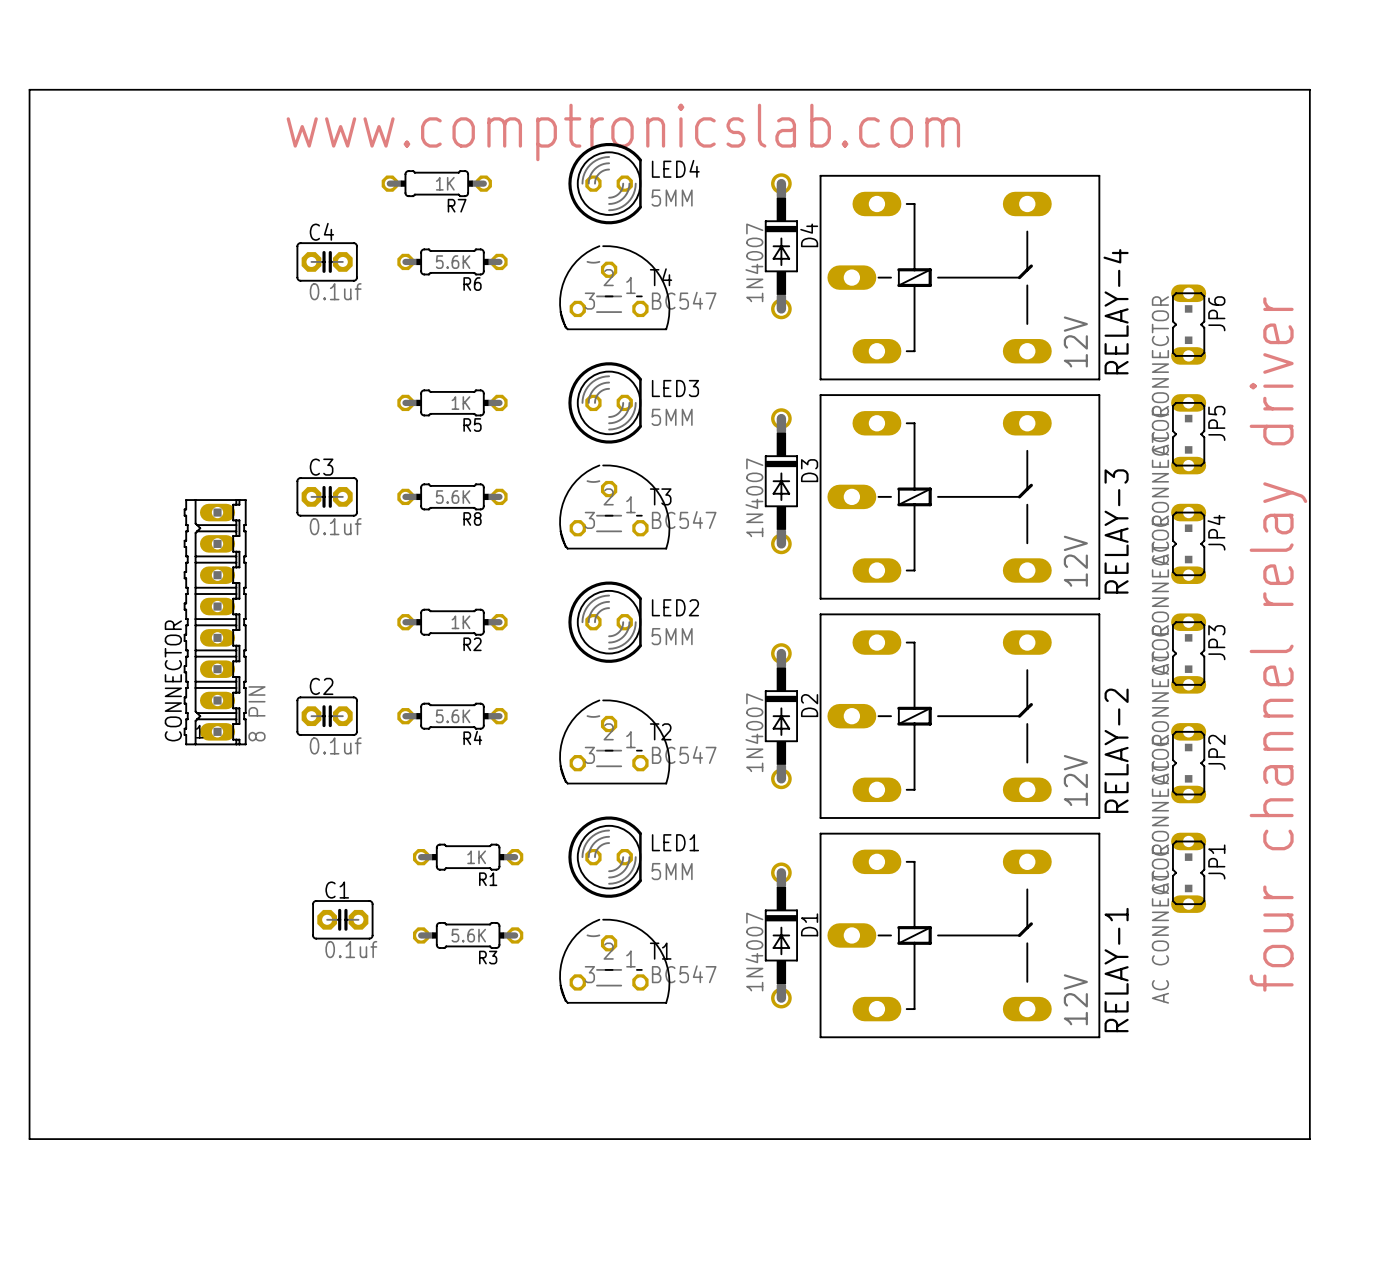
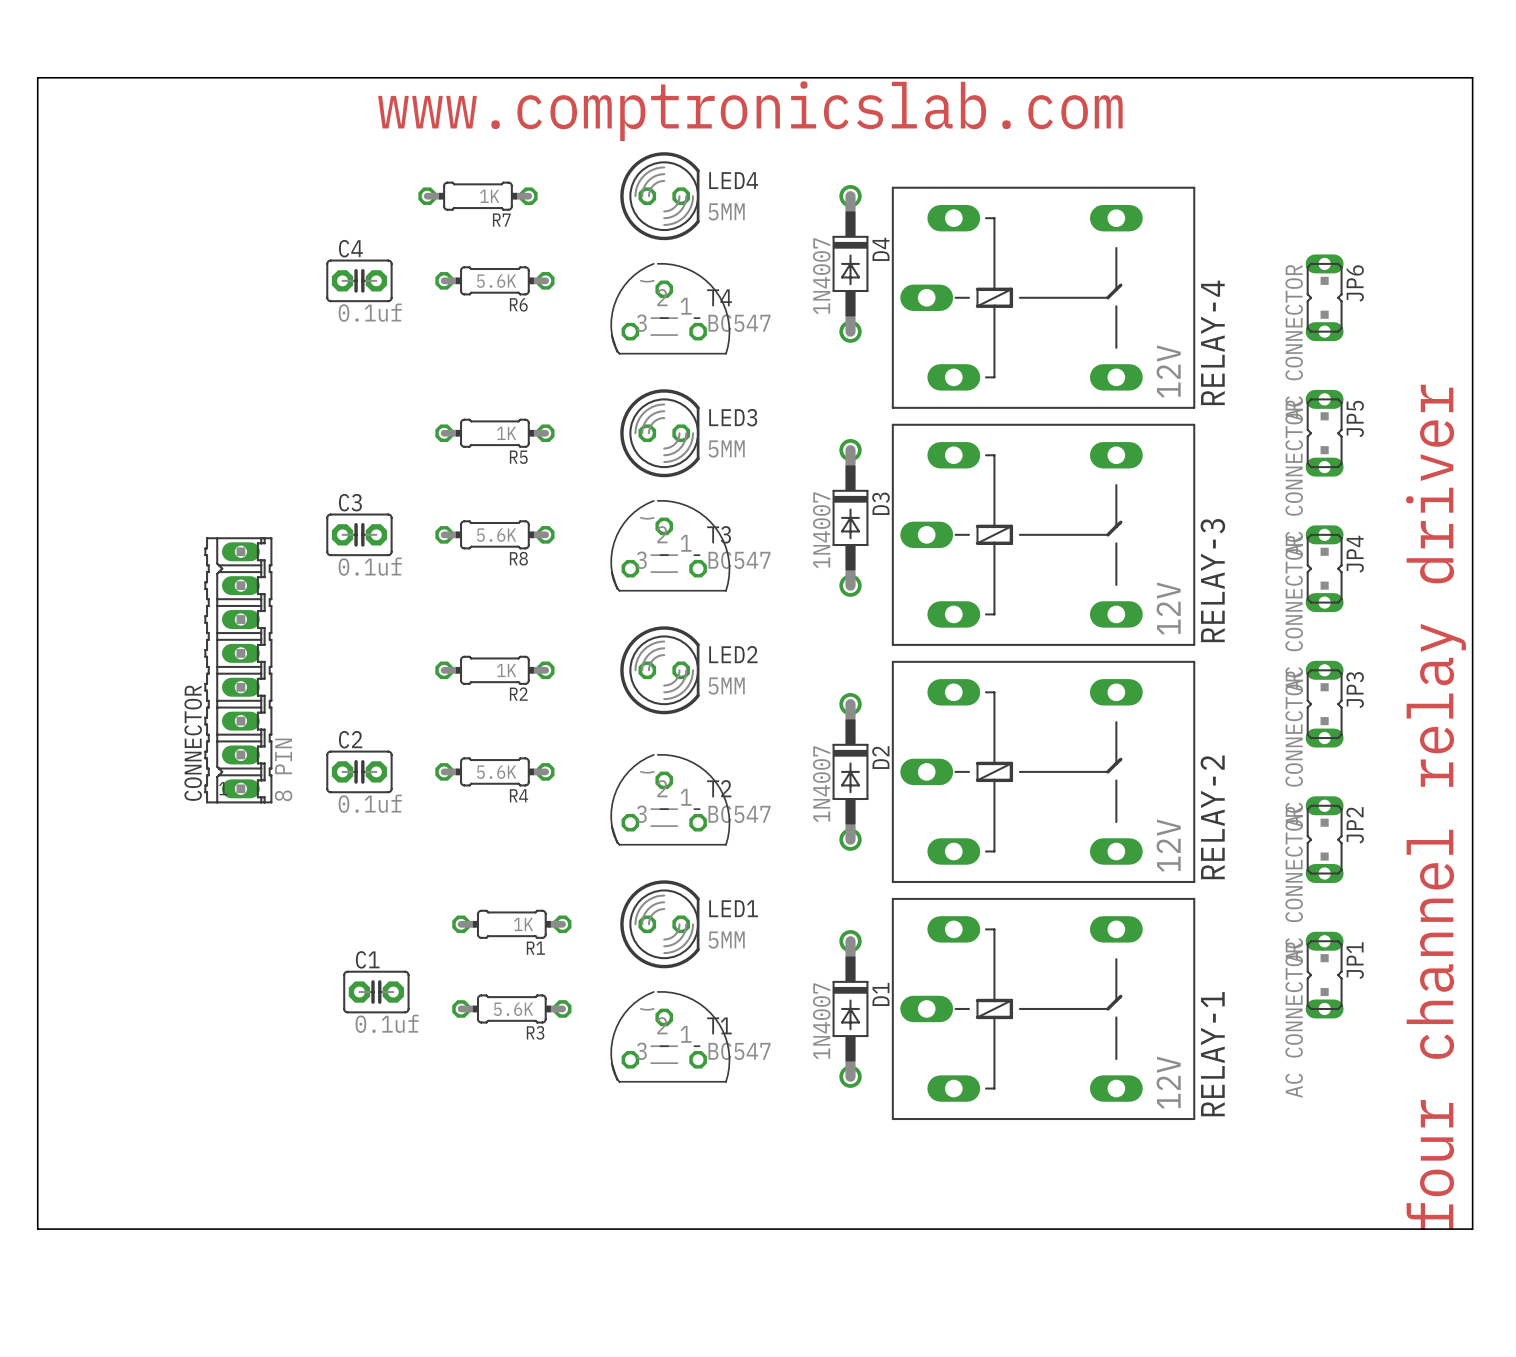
board edge: (29, 89) (1309, 89) (1309, 1139) -> (37, 94) (37, 77) (1472, 77) (1472, 1229) (1421, 1229)
text: none -> www.comptronicslab.com (750, 111)
text: www.comptronicslab.com (623, 132) -> none
JP6 position: (1188, 324) -> (1324, 297)
JP5 position: (1188, 434) -> (1324, 433)
JP4 position: (1188, 543) -> (1324, 568)
text position: four channel relay driver (1278, 644) -> four channel relay driver (1436, 807)
JP3 position: (1188, 653) -> (1324, 704)
JP2 position: (1188, 763) -> (1324, 839)
JP1 position: (1188, 872) -> (1324, 975)

